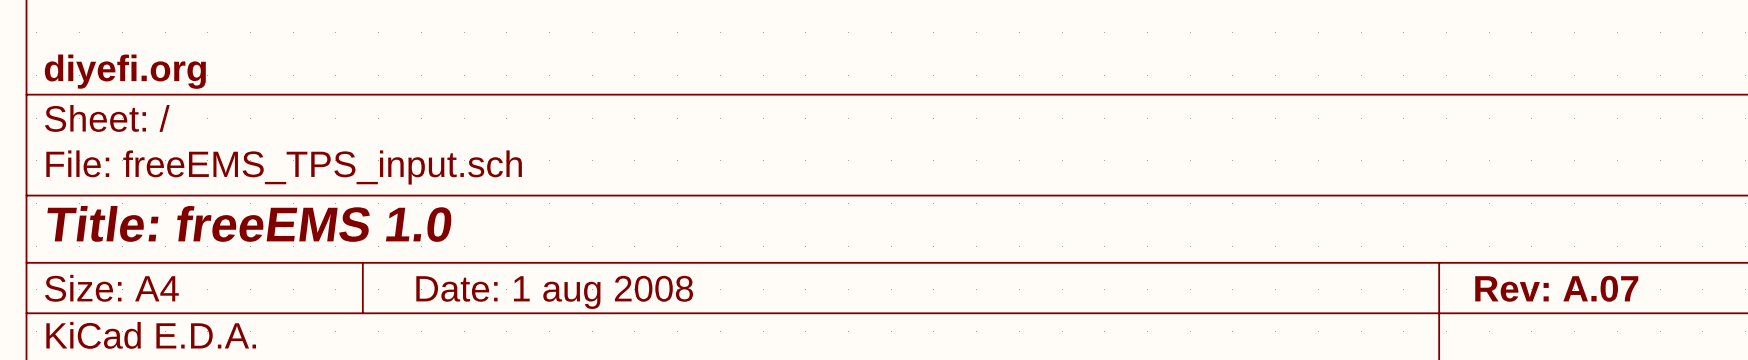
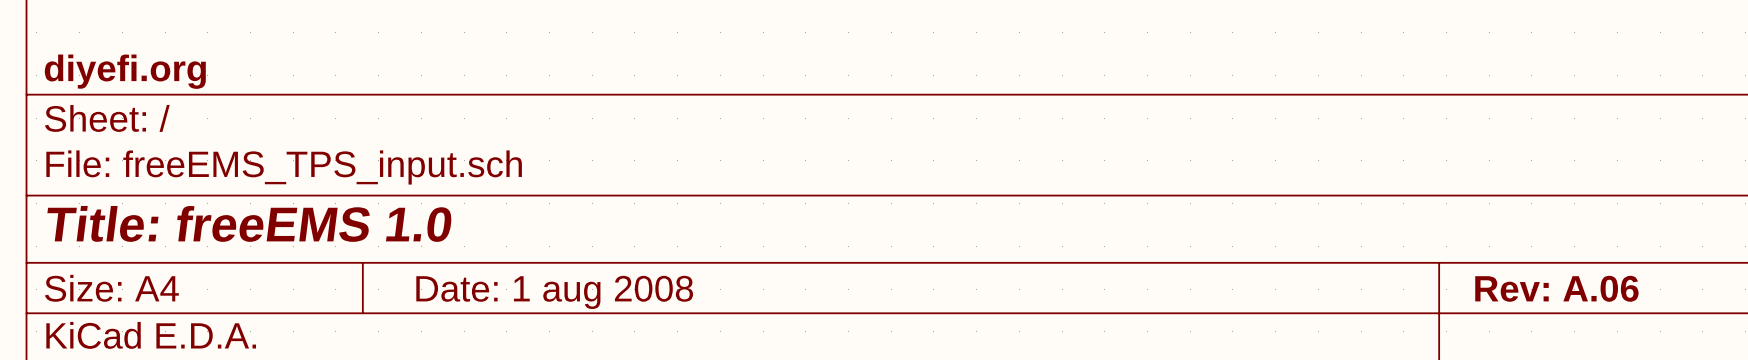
title block: Rev: A.07 (1556, 288) -> Rev: A.06 (1556, 288)

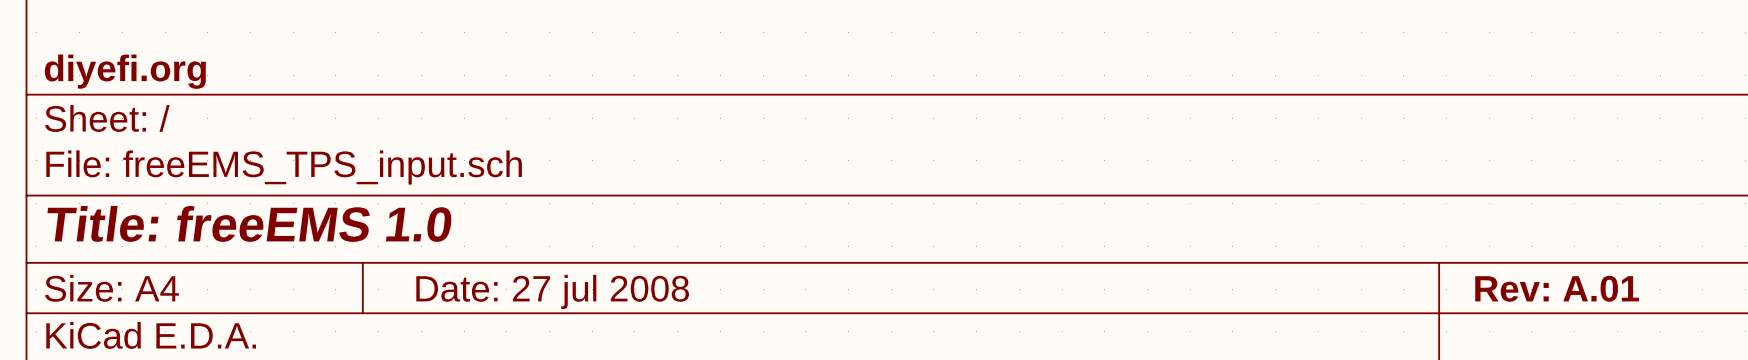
title block: Rev: A.06 (1556, 288) -> Rev: A.01 (1557, 288)
title block: Date: 1 aug 2008 (554, 292) -> Date: 27 jul 2008 (552, 291)

